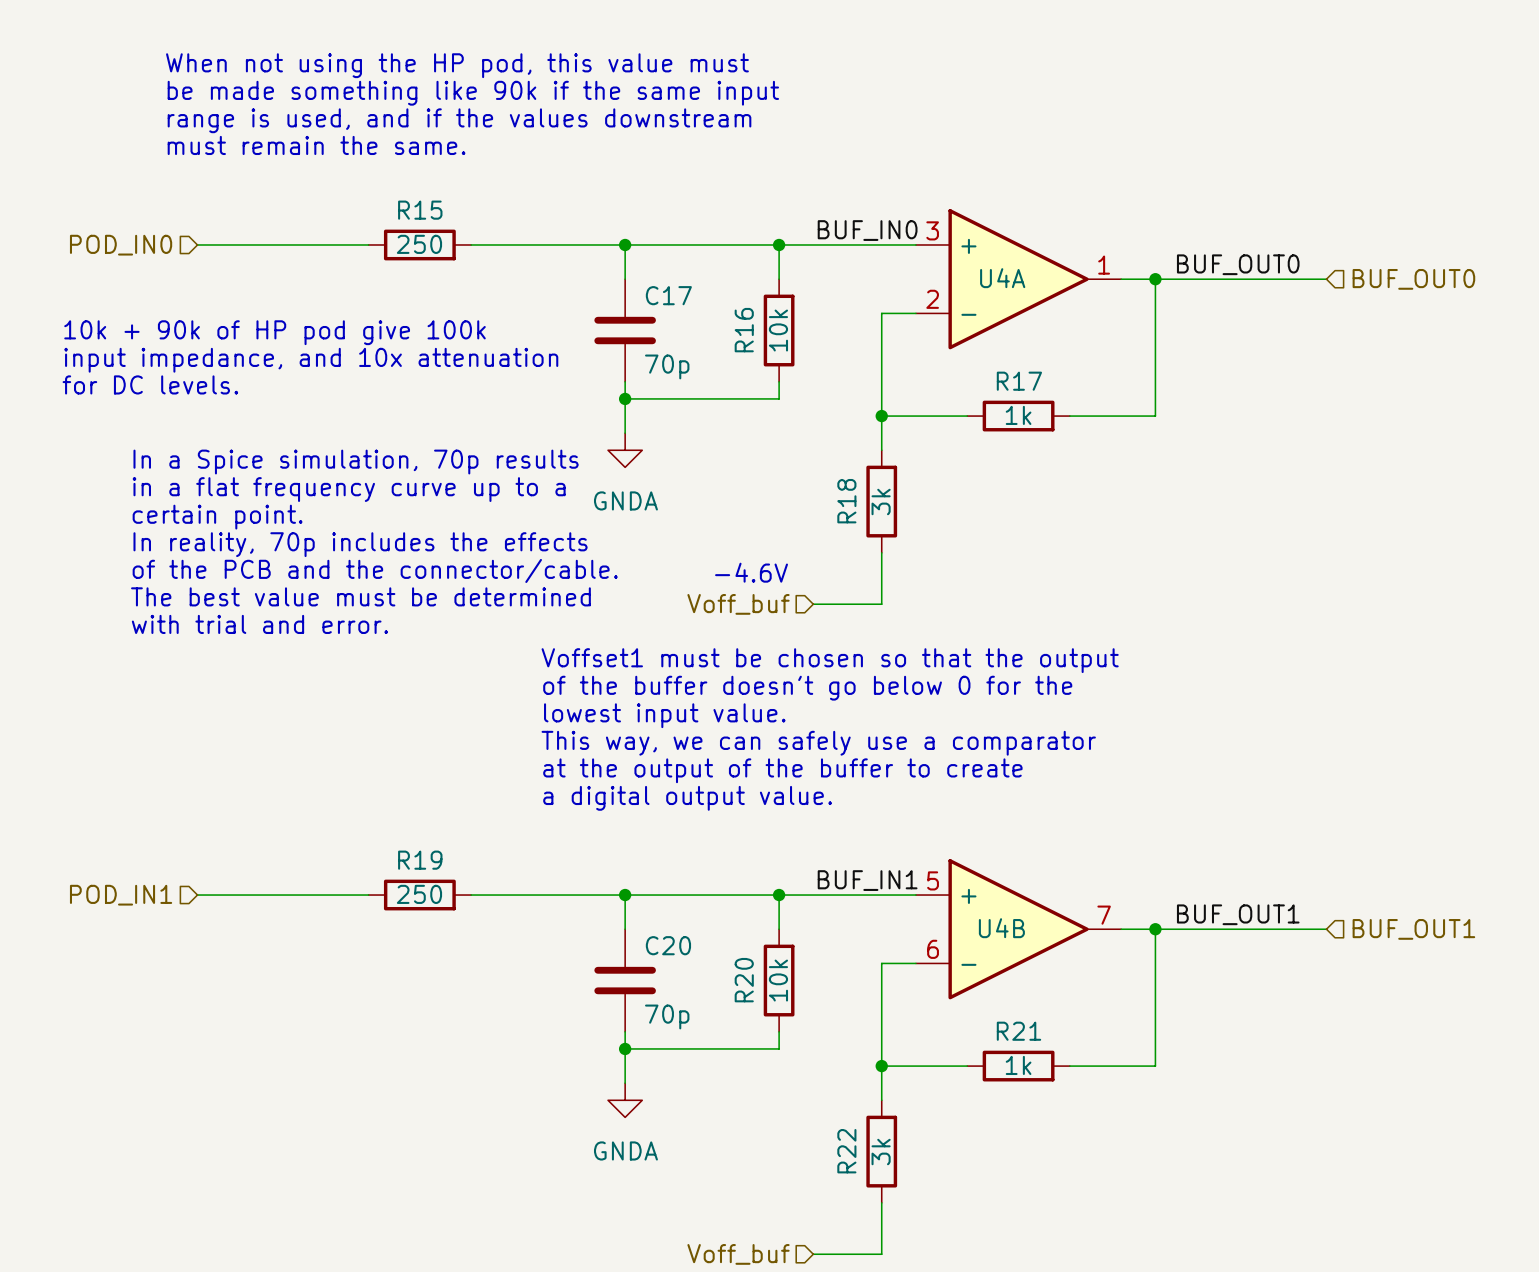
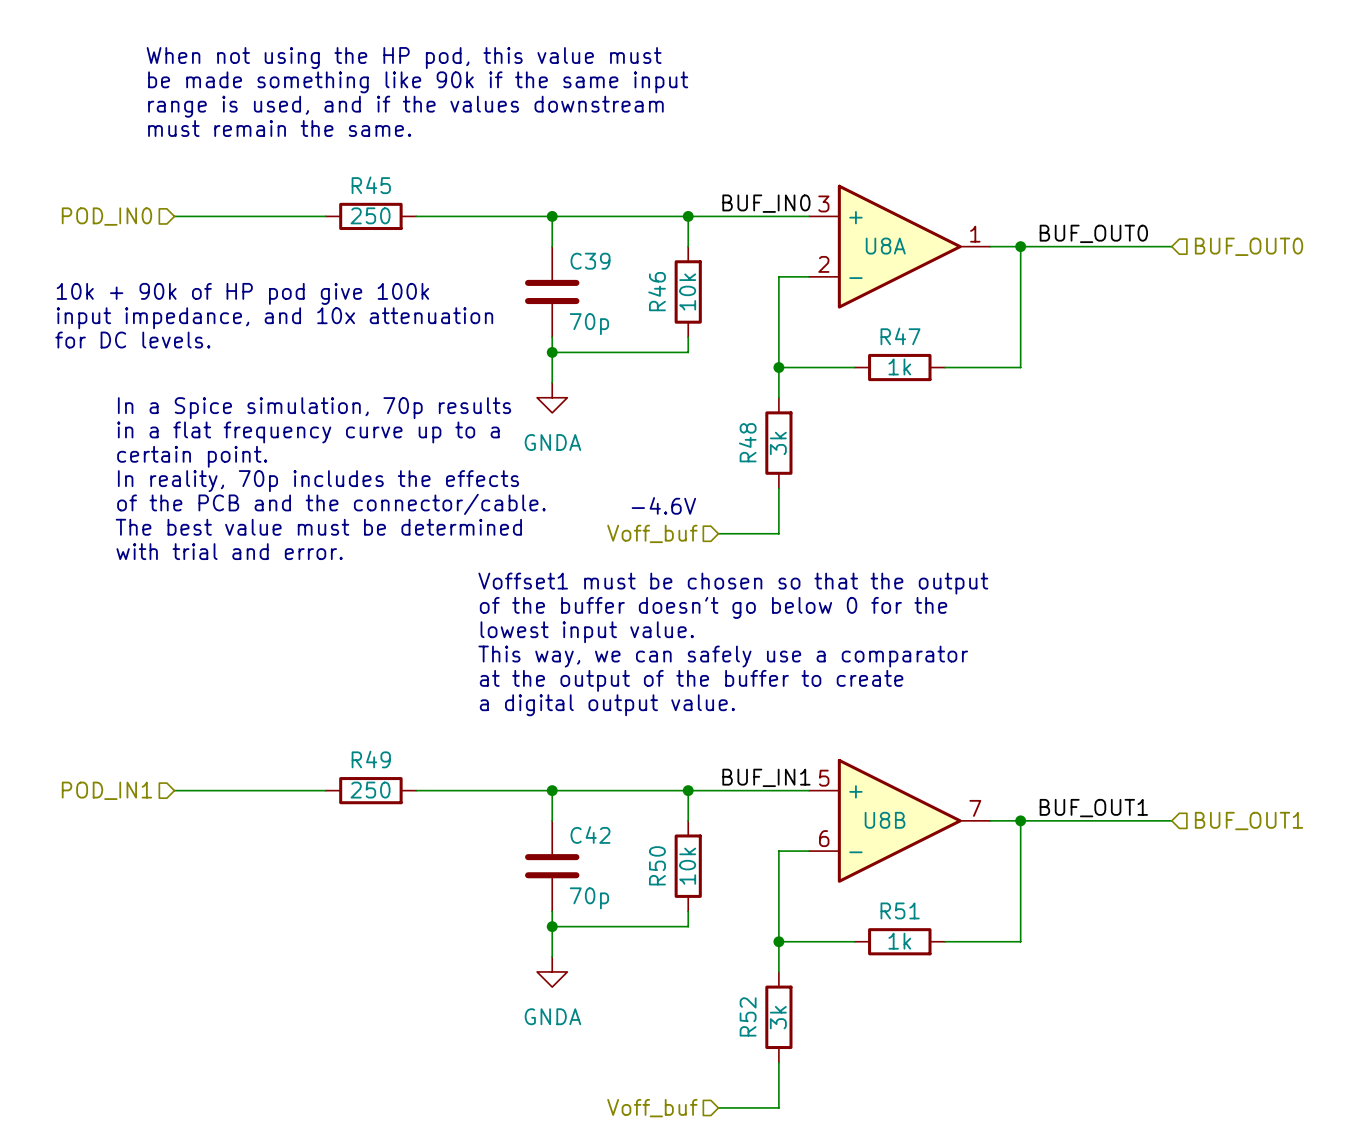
R15 name: R15 (420, 210) -> R45 (371, 185)
U4A name: U4A (1002, 278) -> U8A (885, 246)
C17 name: C17 (668, 295) -> C39 (590, 261)
R16 name: R16 (744, 330) -> R46 (657, 291)
R17 name: R17 (1019, 381) -> R47 (900, 336)
R18 name: R18 (846, 501) -> R48 (747, 442)
R19 name: R19 (420, 860) -> R49 (371, 759)
U4B name: U4B (1001, 928) -> U8B (885, 820)
C20 name: C20 (668, 945) -> C42 (590, 835)
R20 name: R20 (744, 980) -> R50 (657, 865)
R21 name: R21 (1018, 1031) -> R51 (900, 910)
R22 name: R22 (846, 1151) -> R52 (748, 1016)

